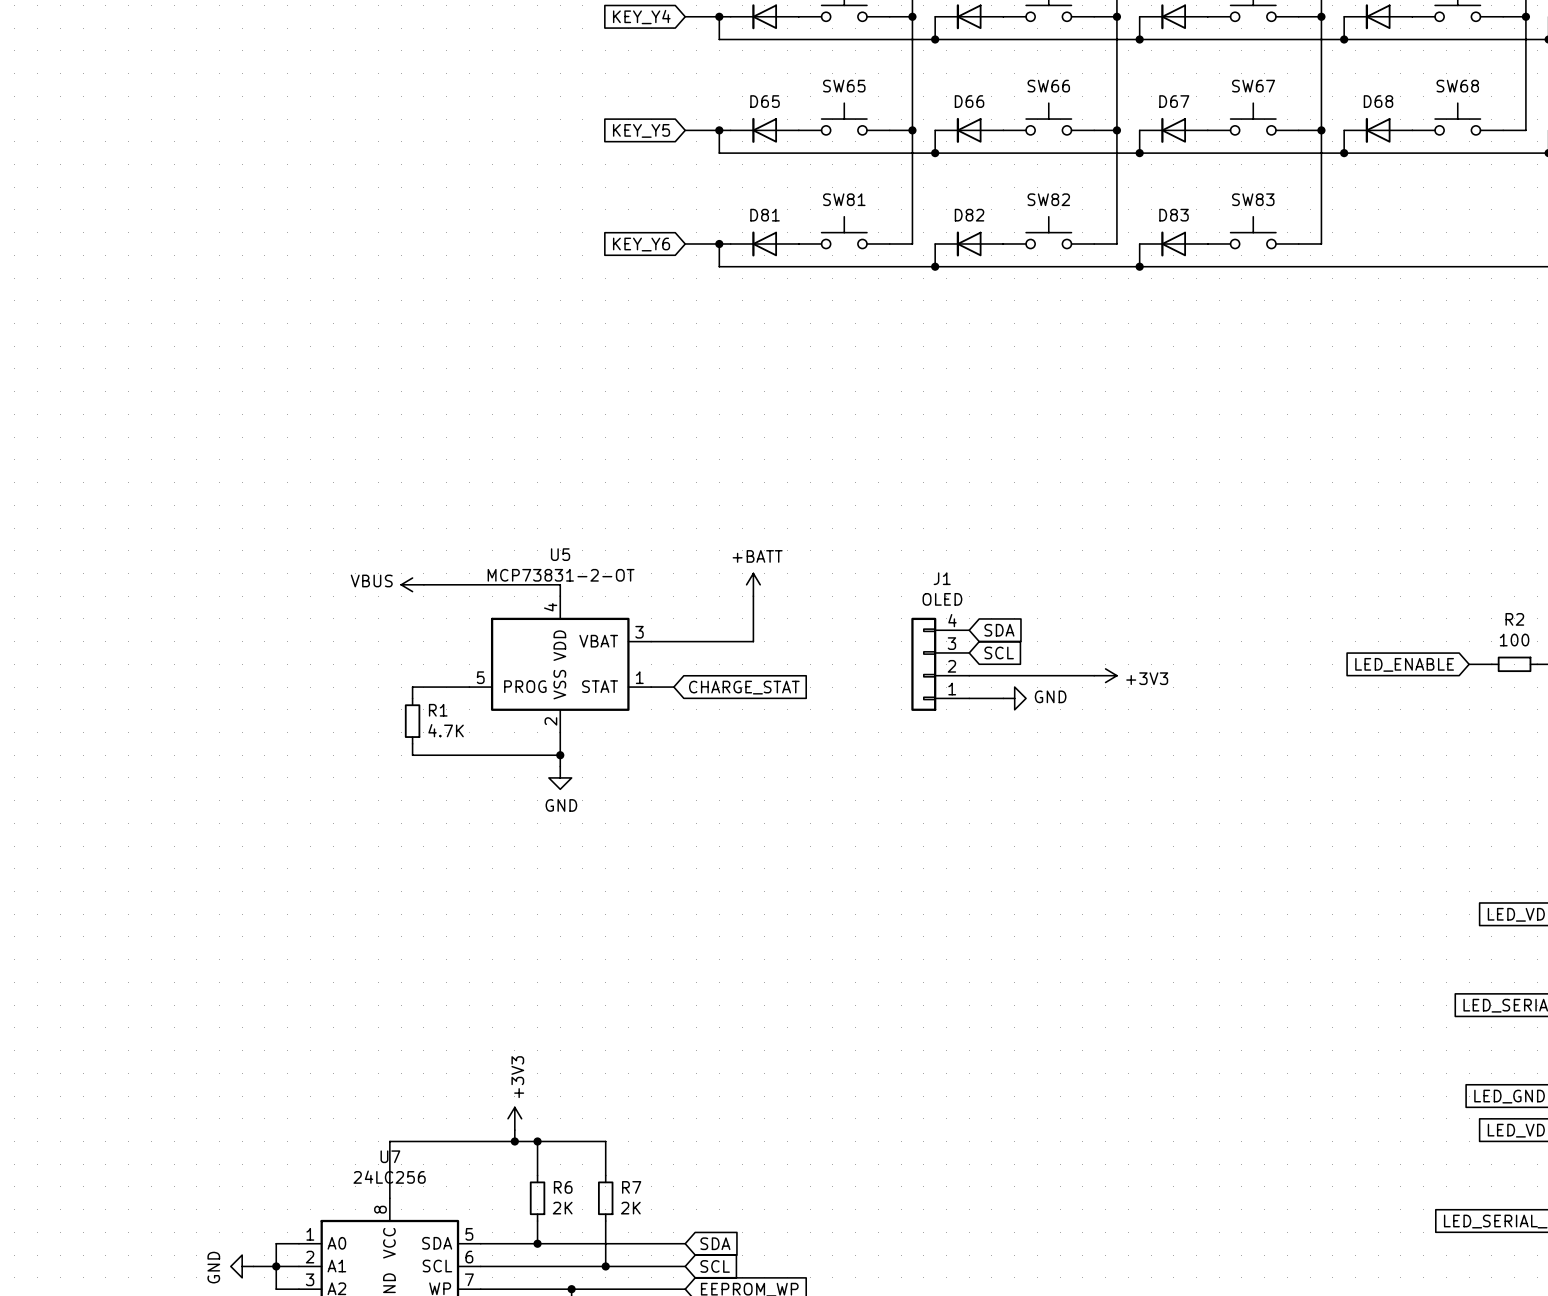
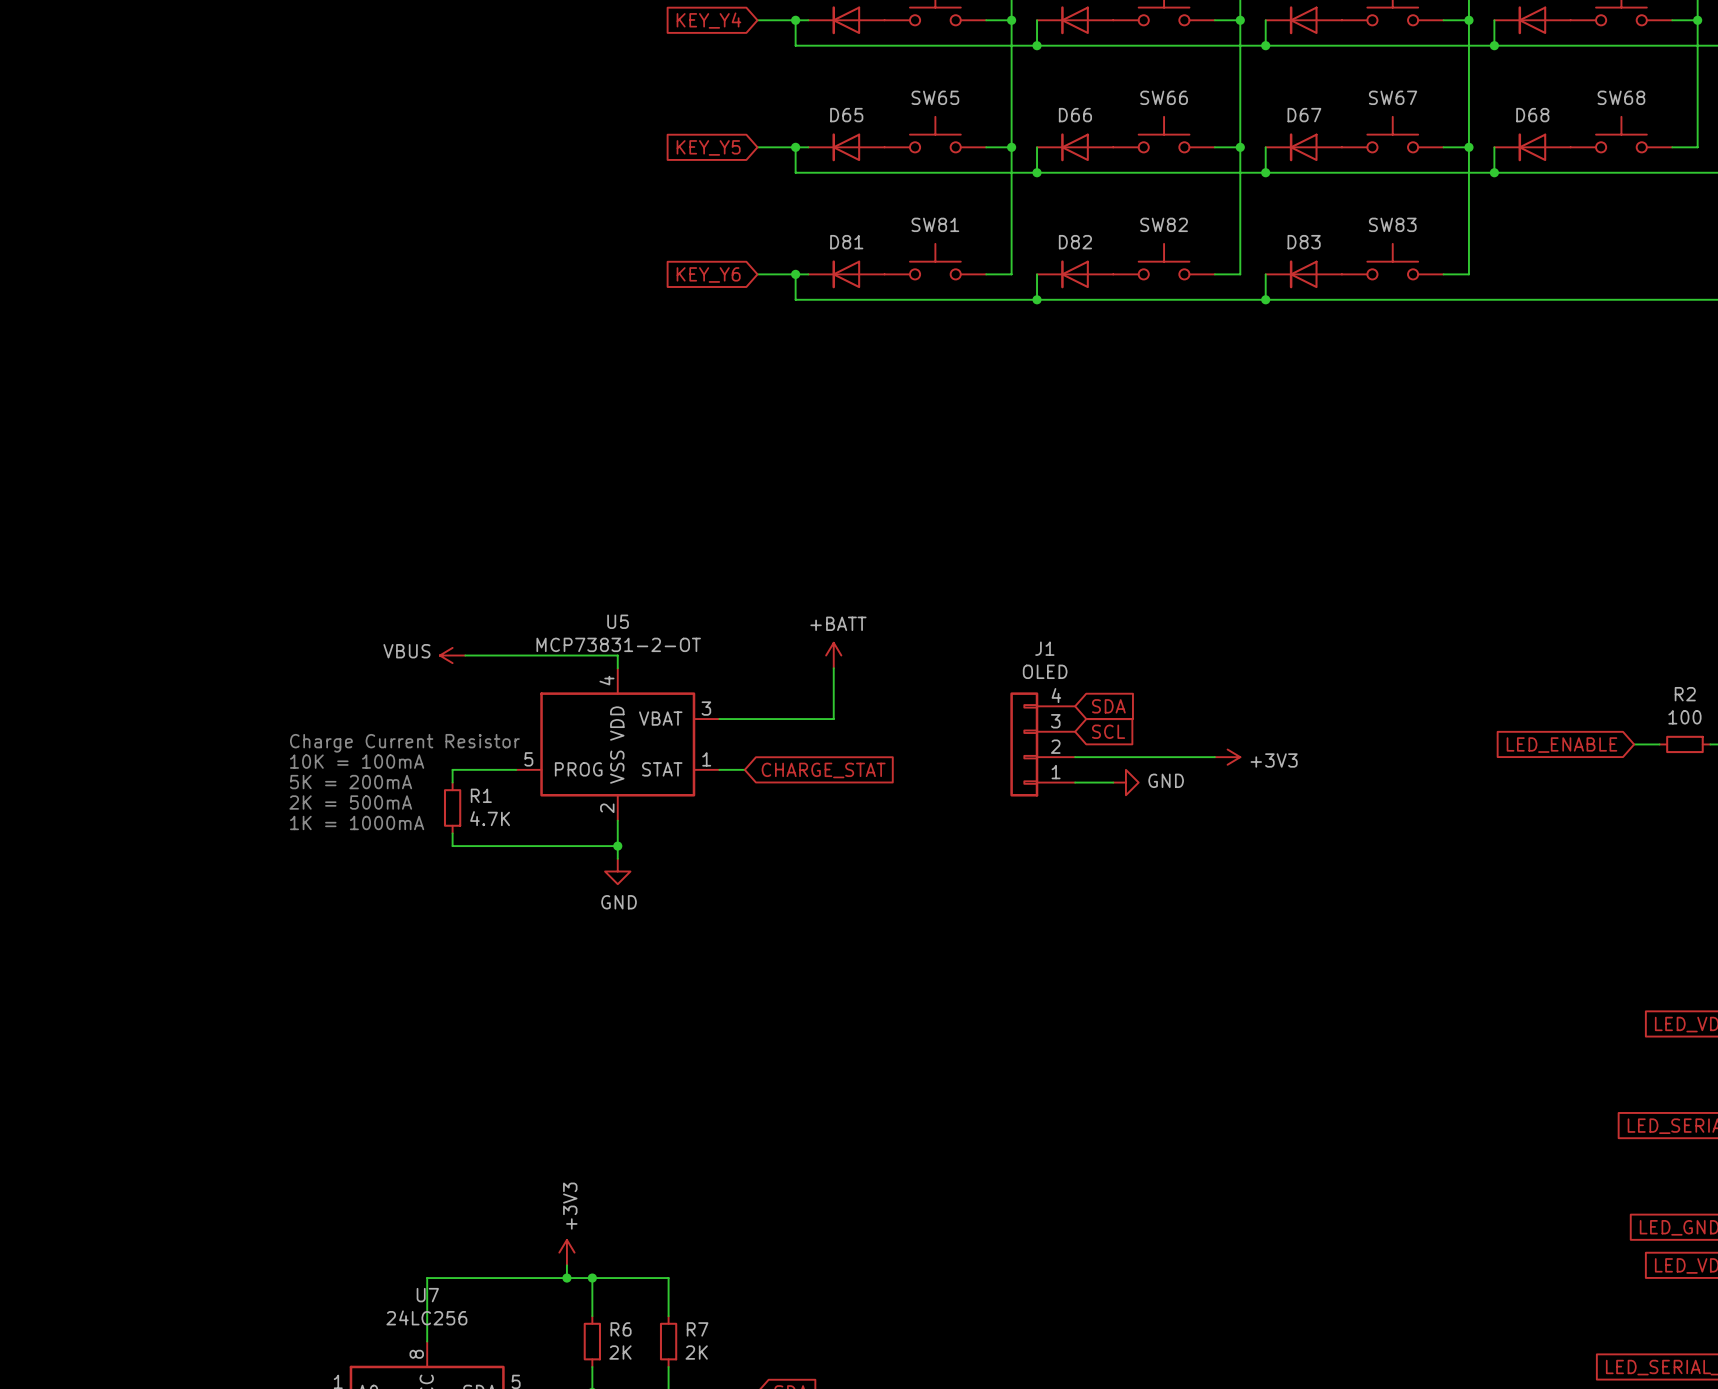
text: none -> Charge Current Resistor (404, 743)
text: none -> 10K = 100mA (357, 761)
text: none -> 5K = 200mA (351, 782)
text: none -> 2K = 500mA (350, 802)
text: none -> 1K = 1000mA (357, 822)

